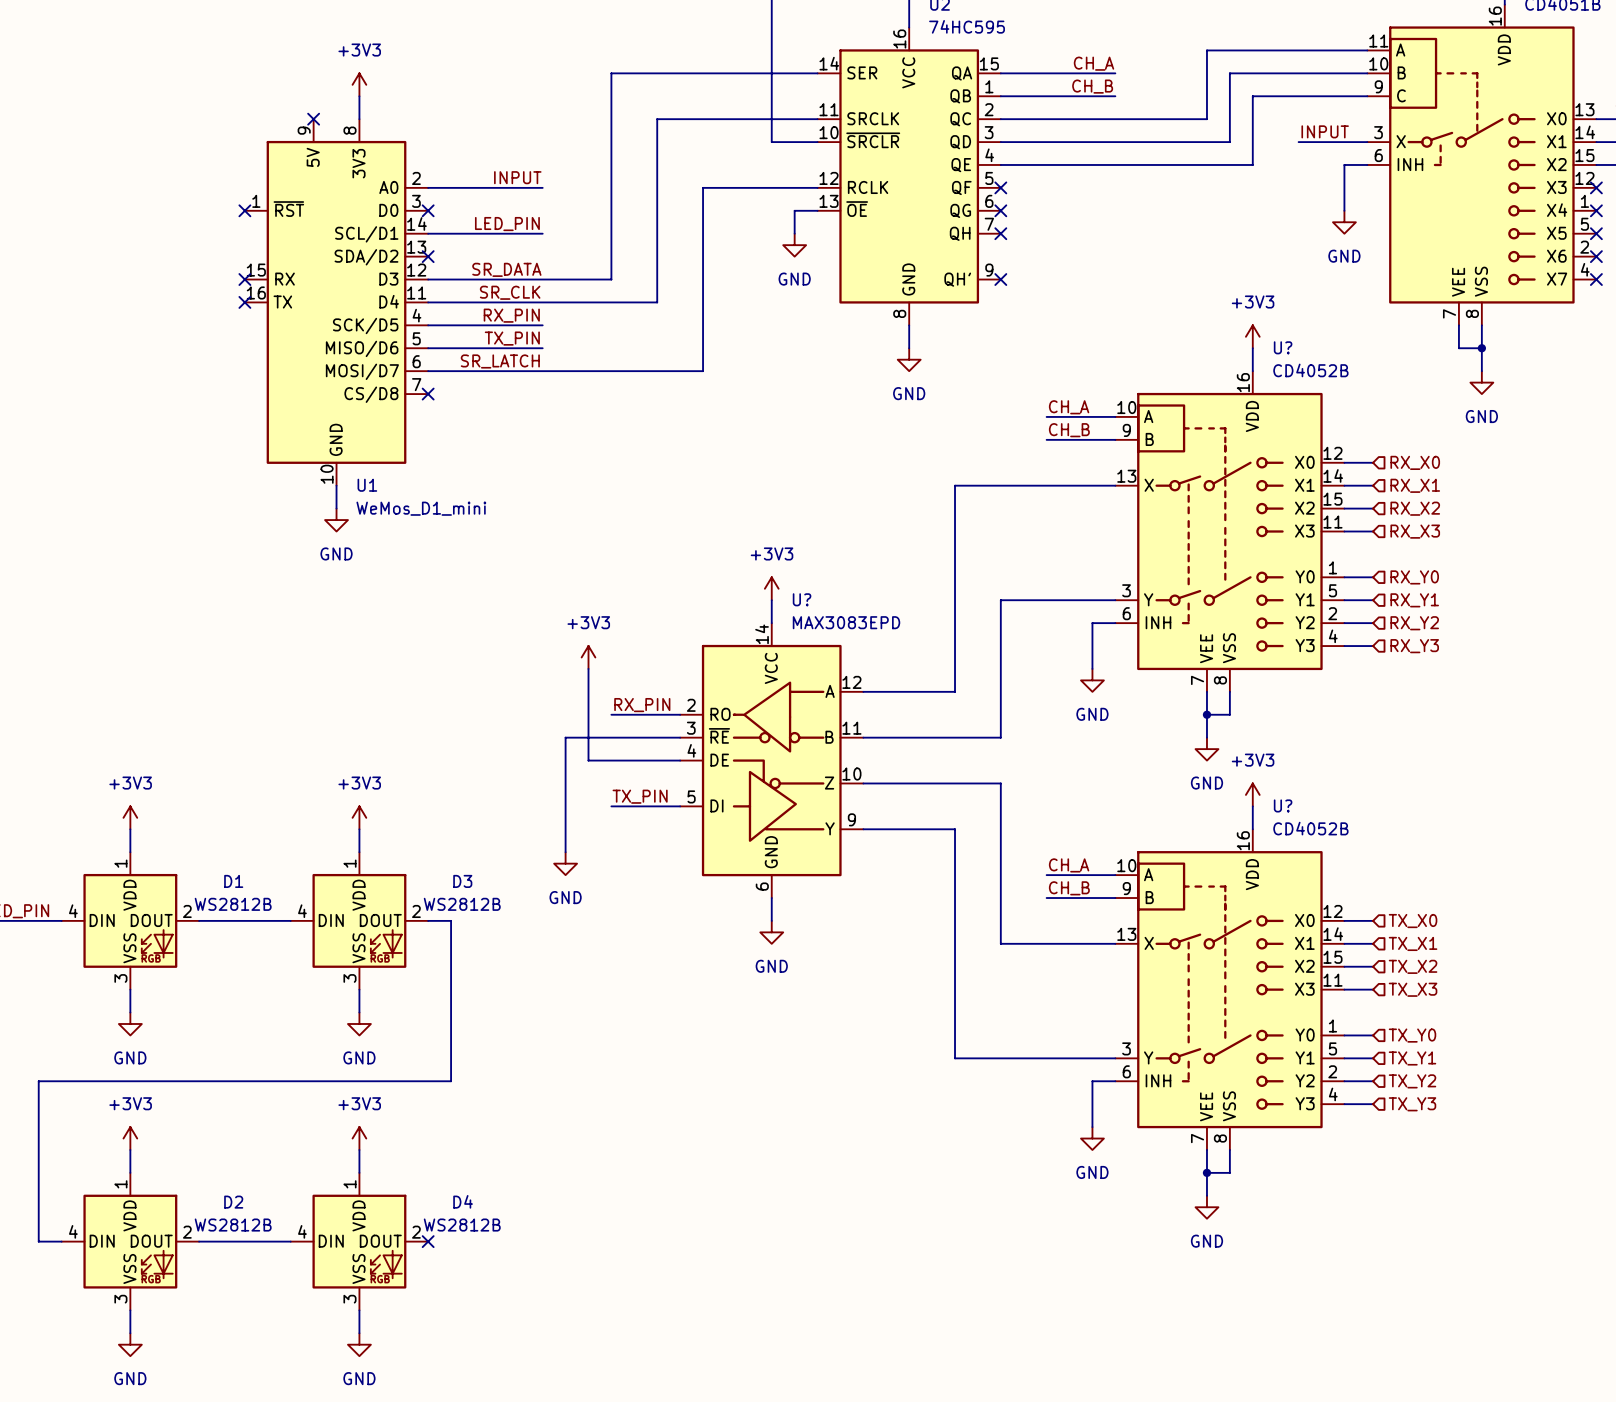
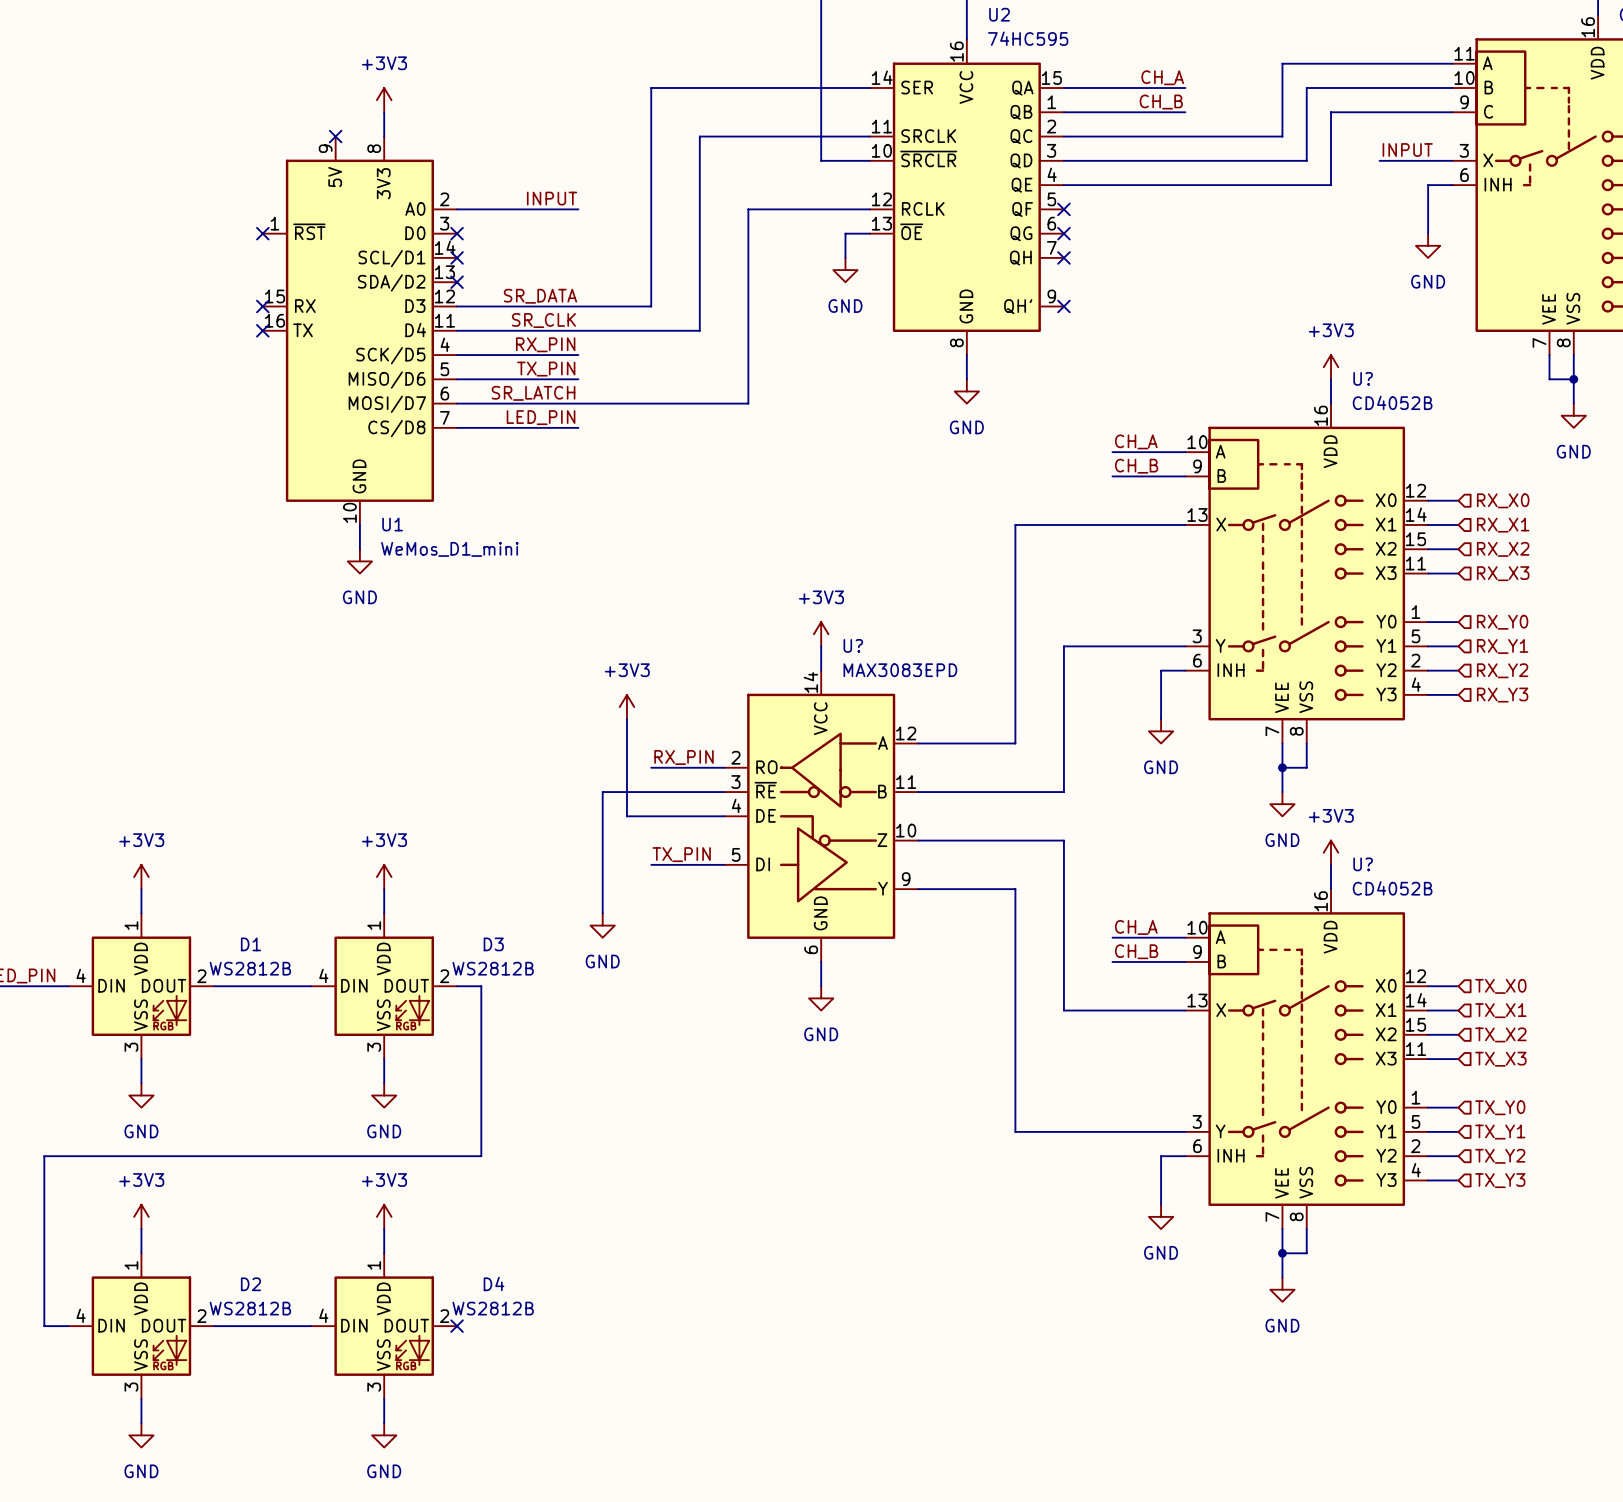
label position: LED_PIN (507, 224) -> LED_PIN (541, 417)
wire: (428, 233) (542, 233) -> (457, 427) (578, 427)
no-connect mark: none -> (457, 257)
no-connect mark: (428, 394) -> none

